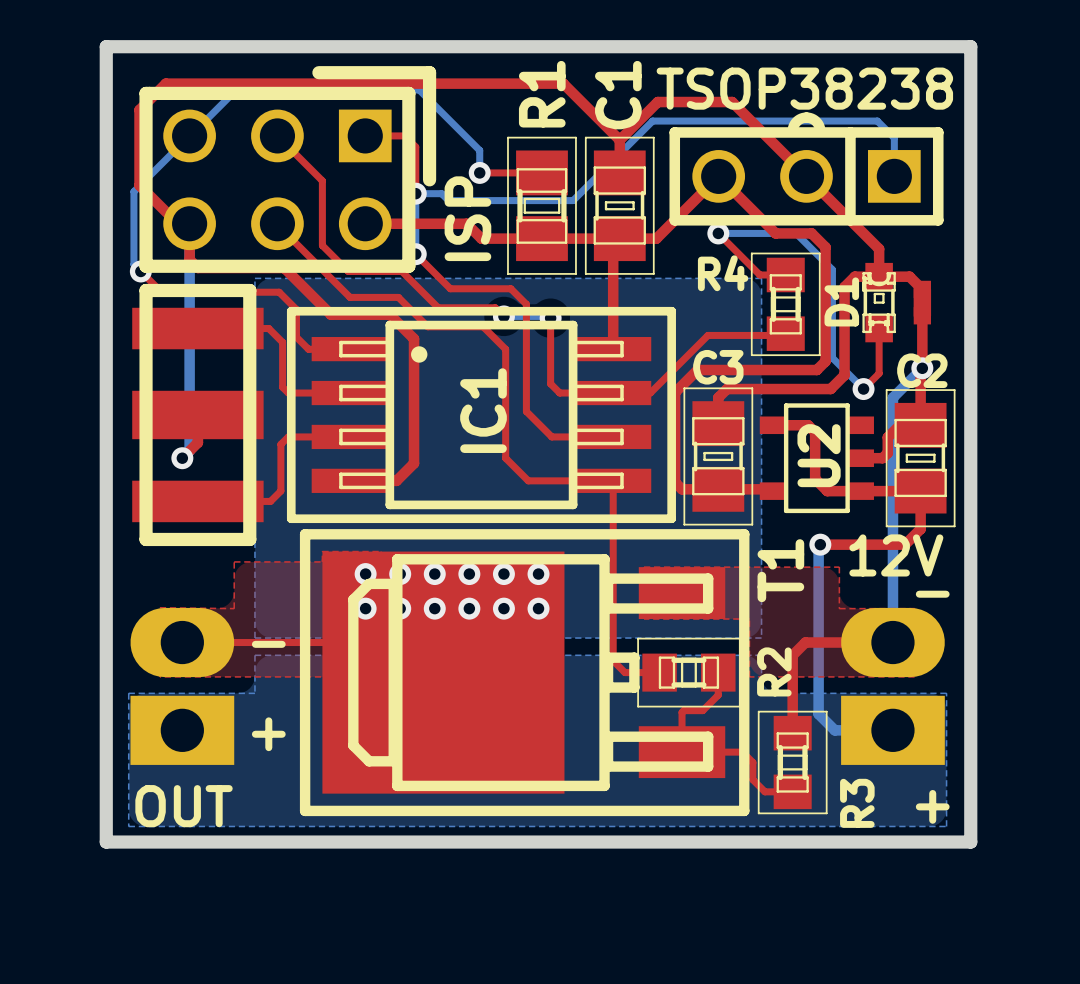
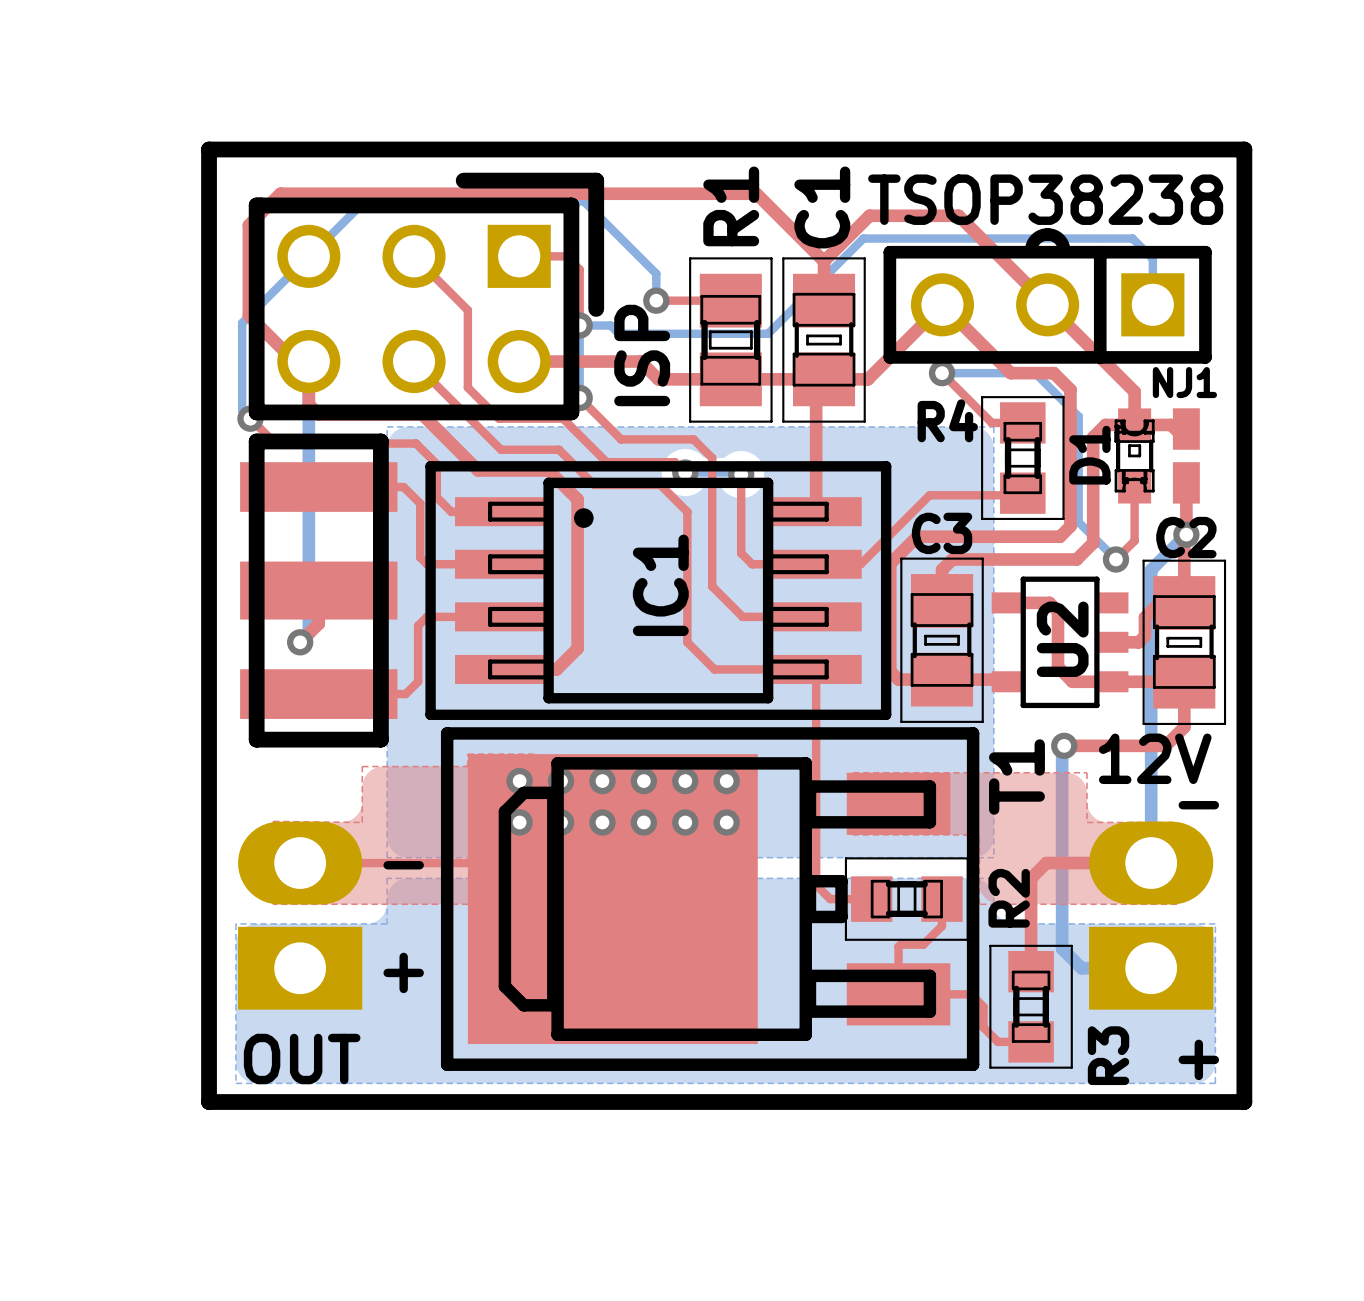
part: (922, 302) -> none
NJ1: none -> (1186, 455)

